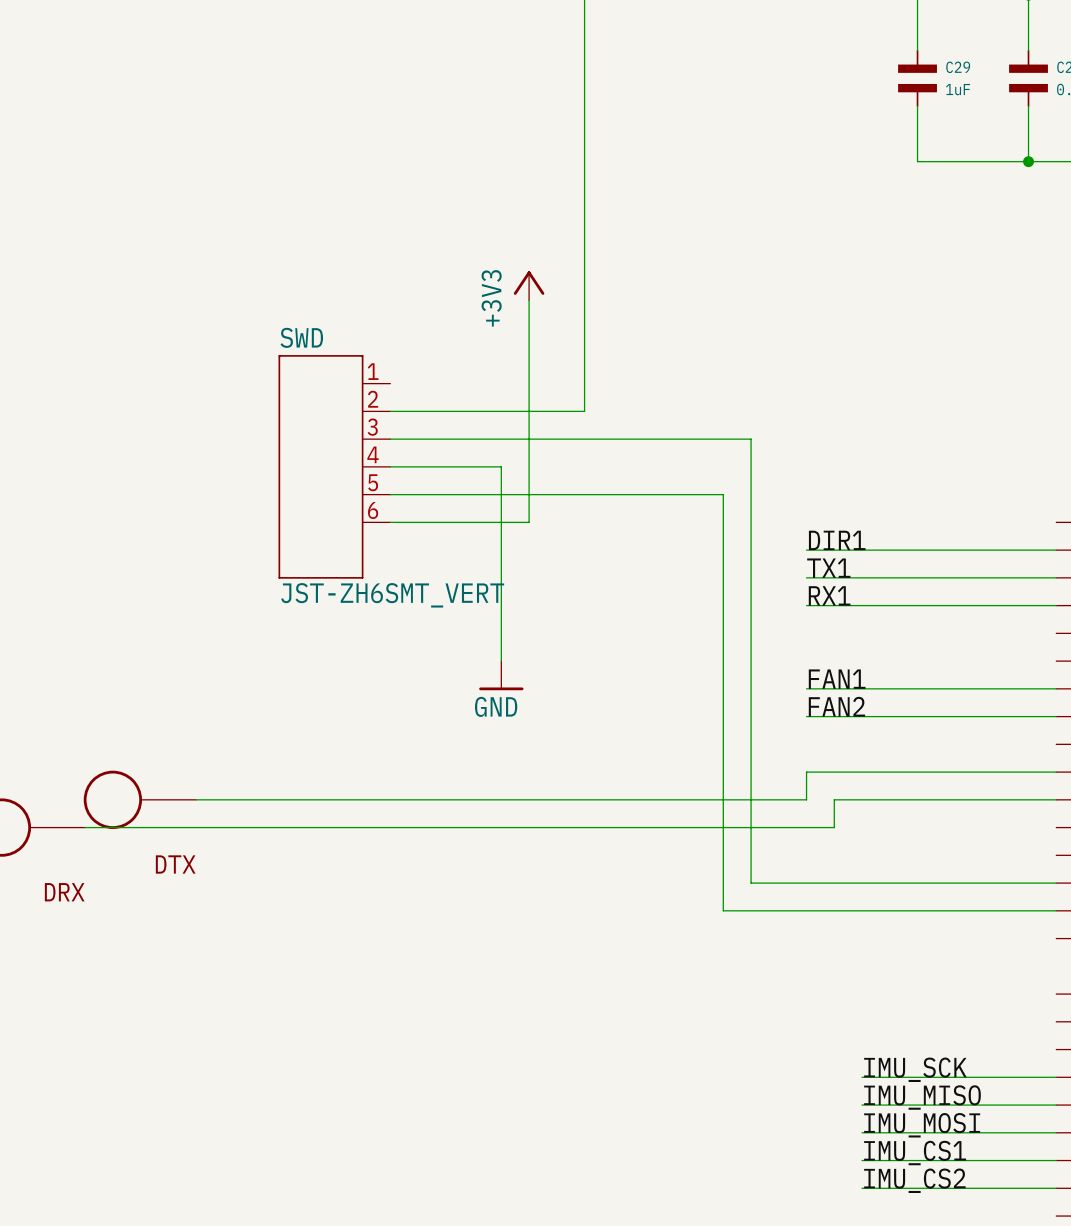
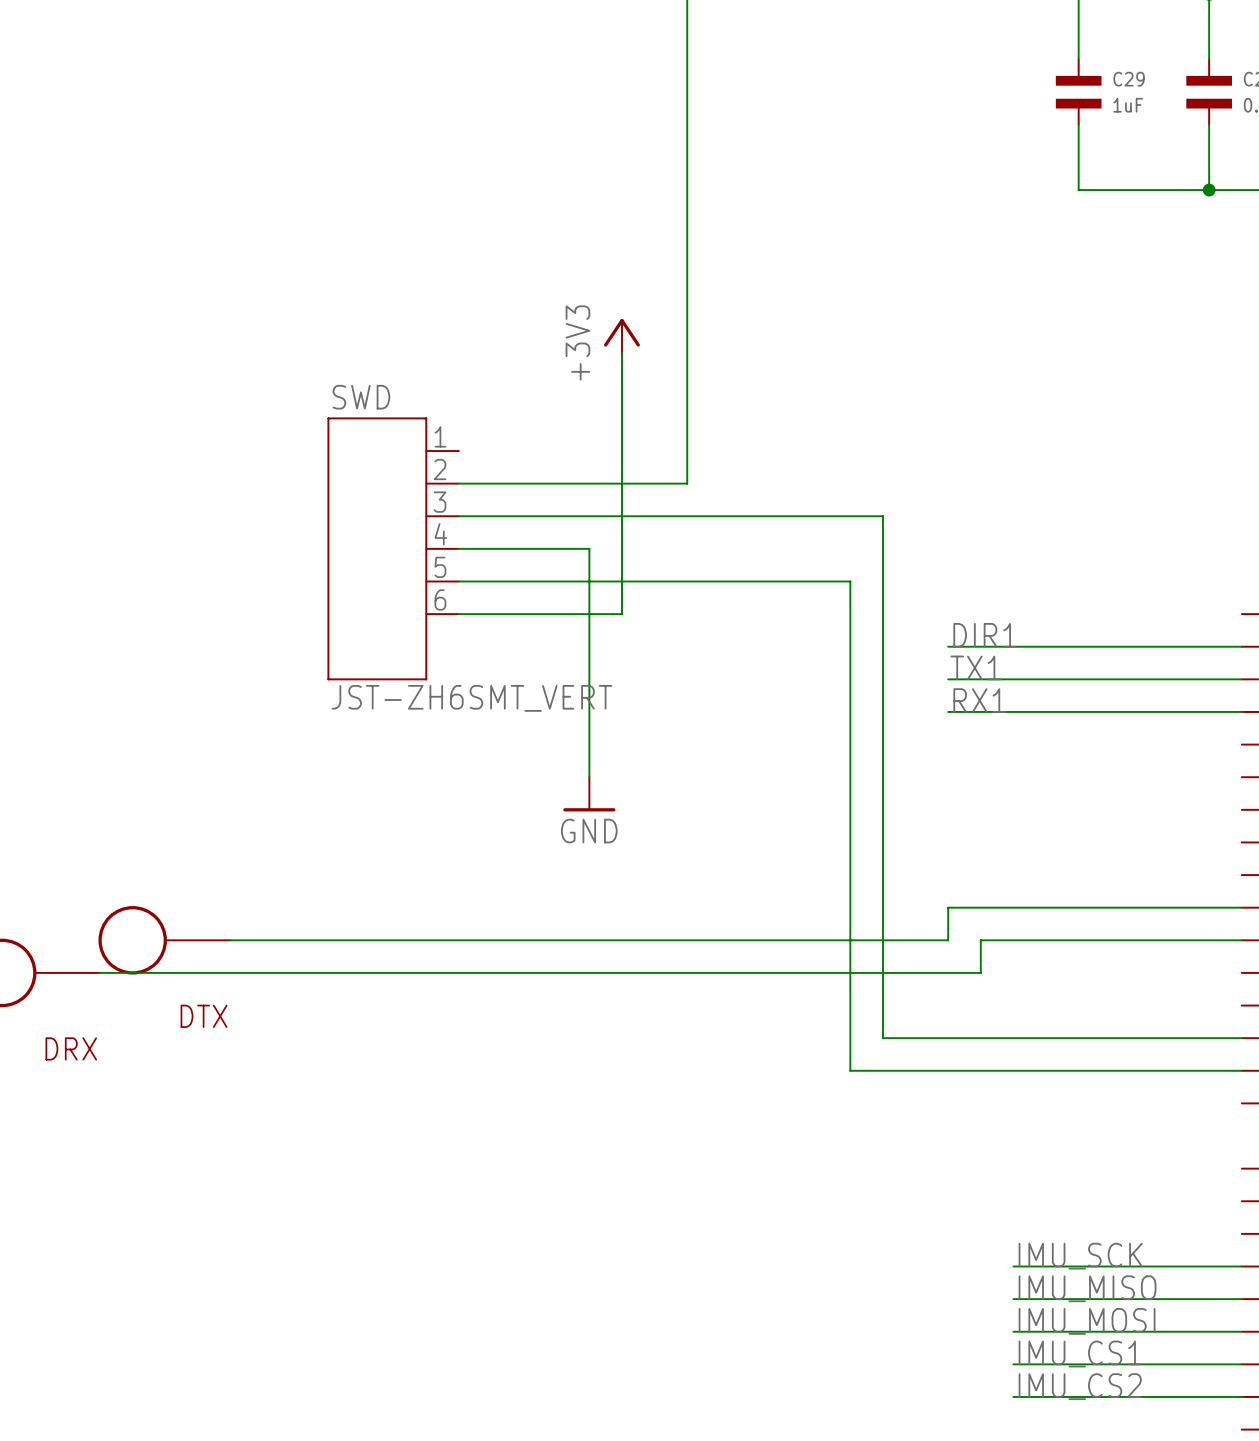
label: FAN1 (837, 679) -> none
wire: (806, 688) (1056, 688) -> none
label: FAN2 (836, 706) -> none
wire: (806, 716) (1056, 716) -> none

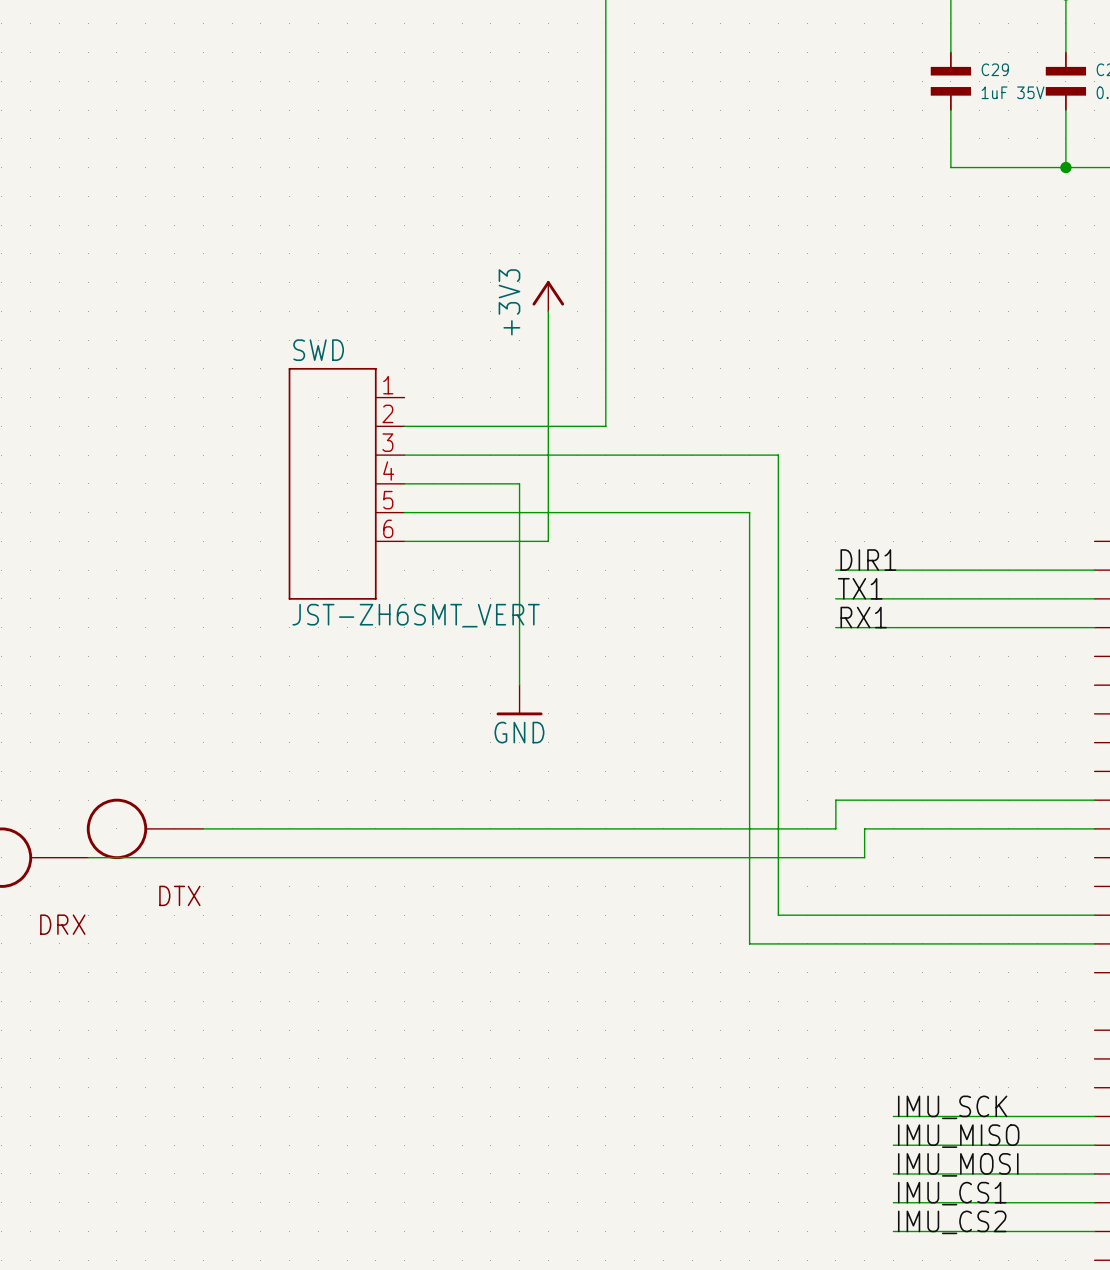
C29 value: 1uF (1128, 105) -> 1uF 35V (1013, 92)

